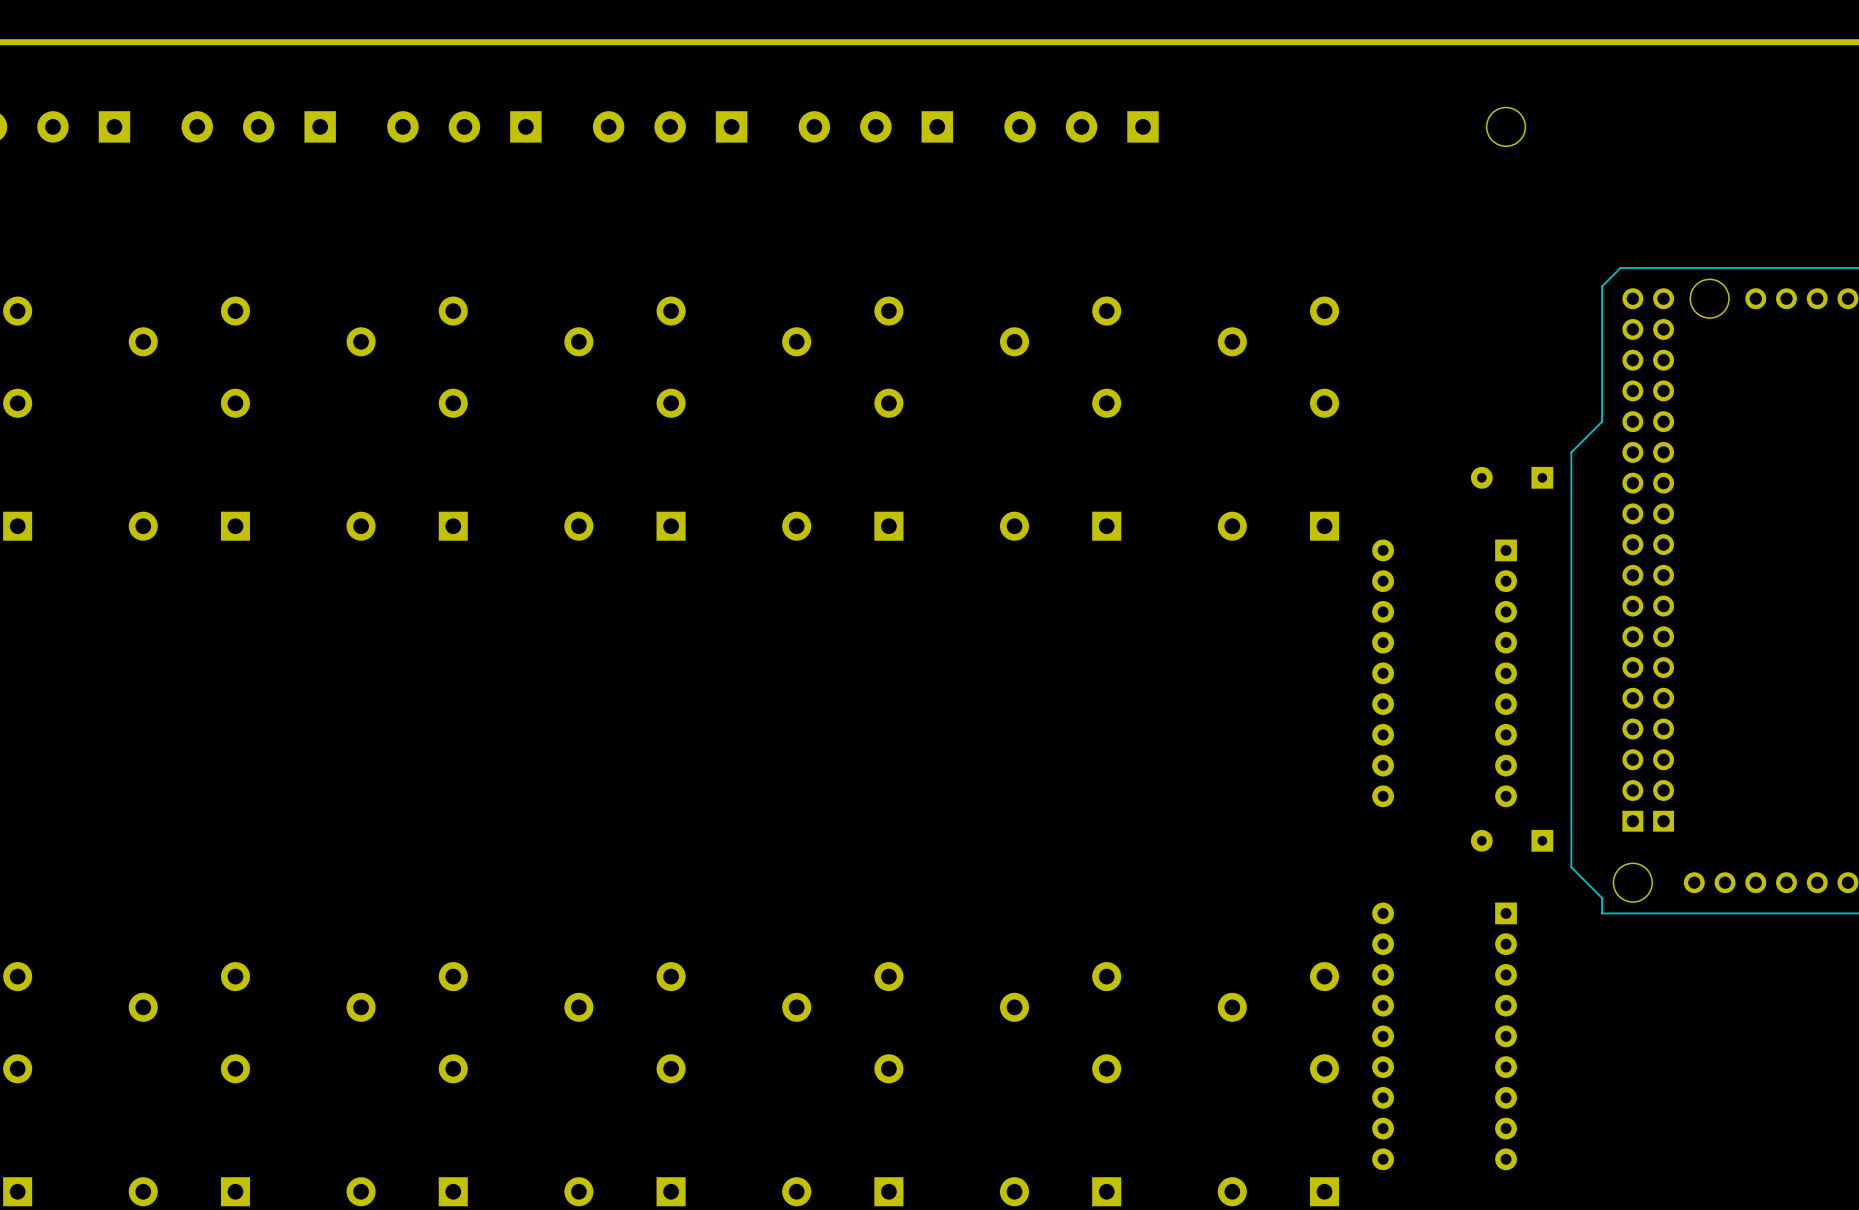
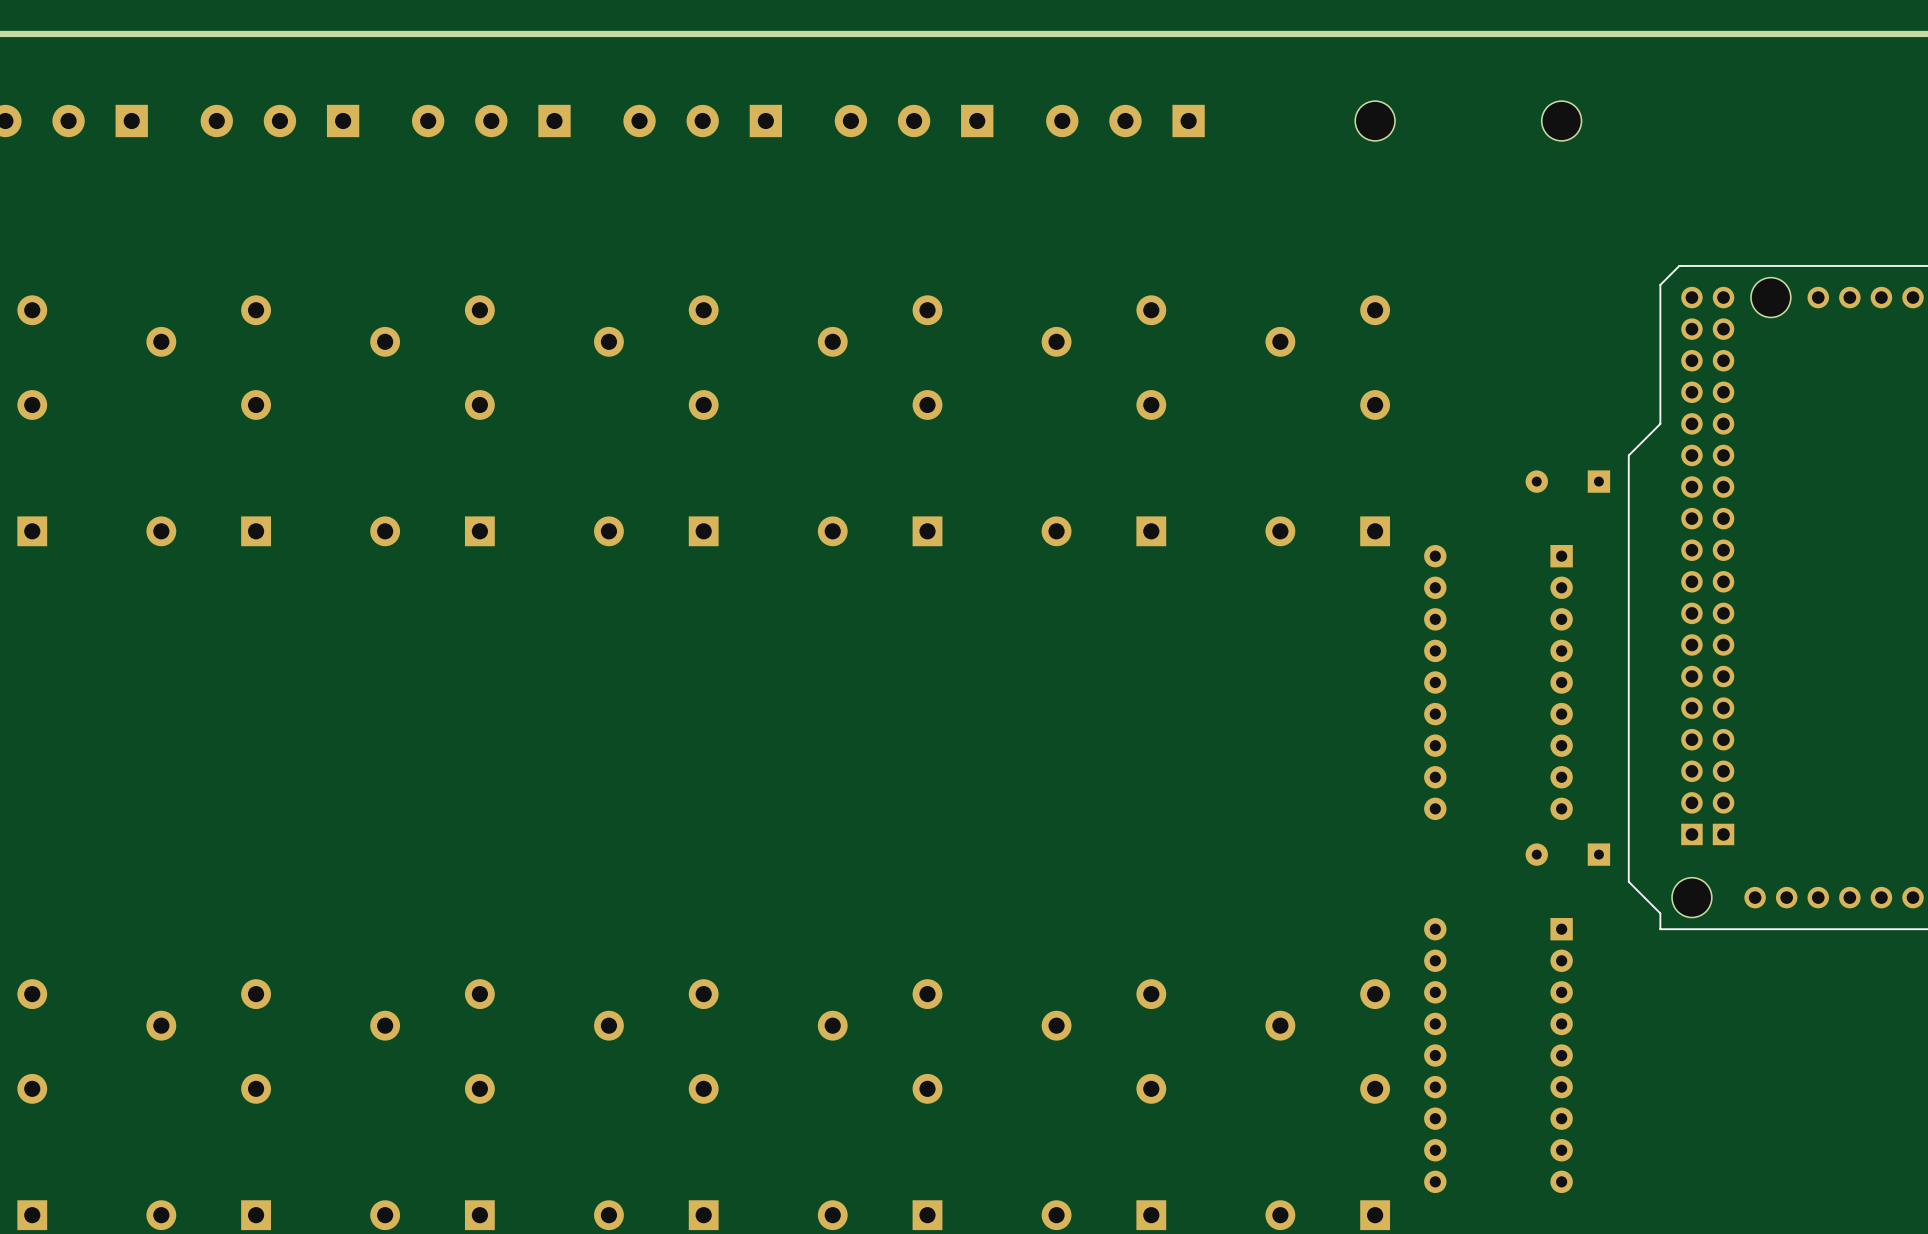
part: none -> (1375, 121)

